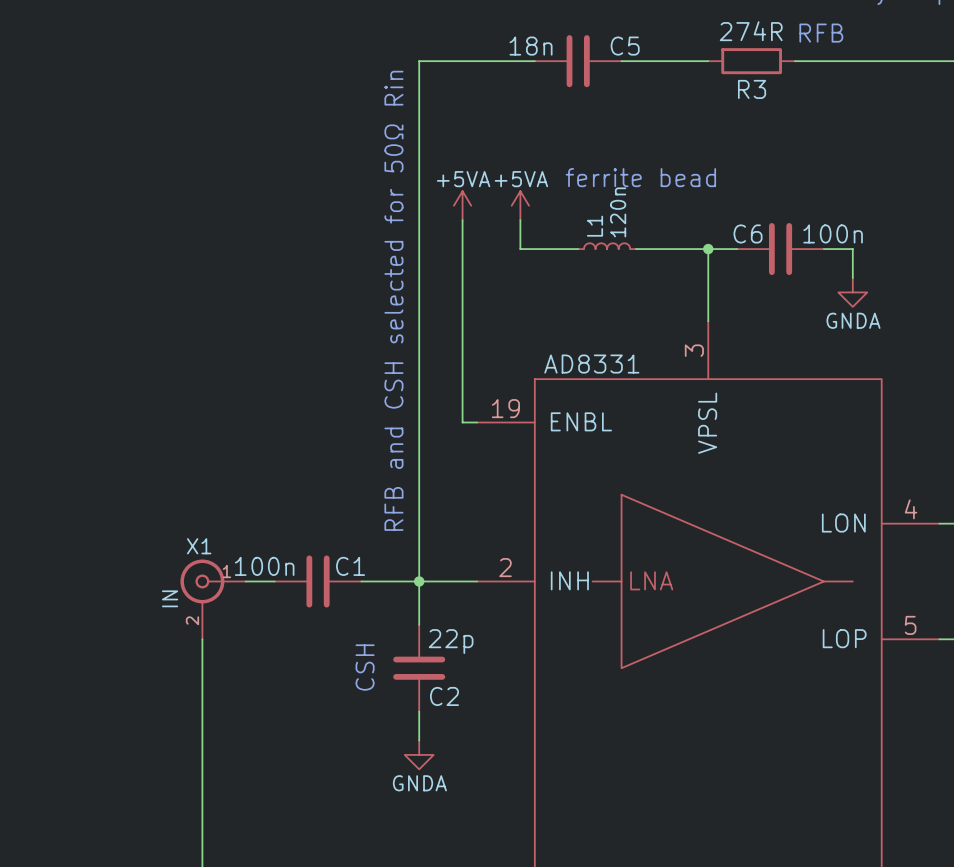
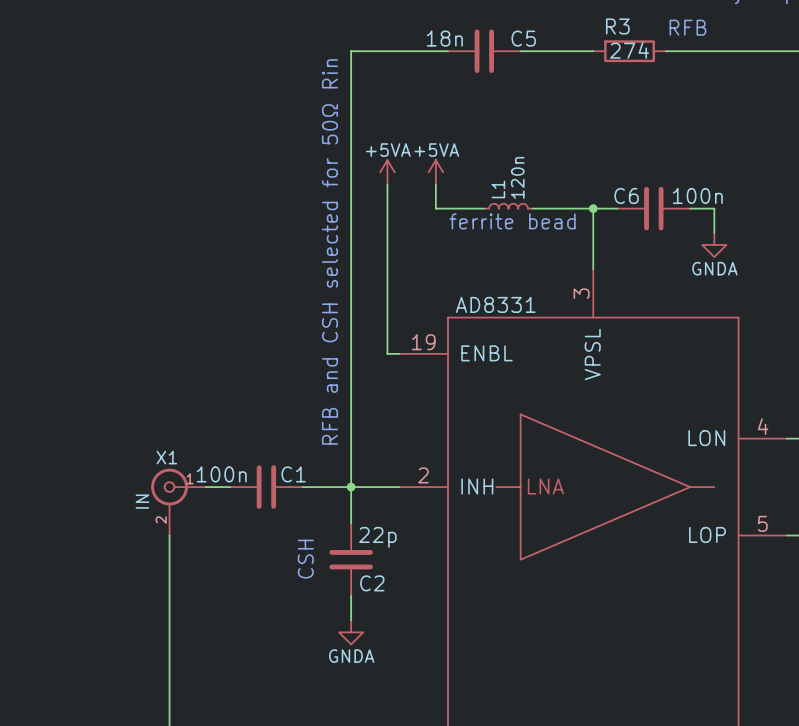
R3 value: 274R (751, 31) -> 274 (629, 50)
R3 name position: R3 (752, 89) -> R3 (617, 26)
text position: ferrite bead (640, 177) -> ferrite bead (512, 221)

